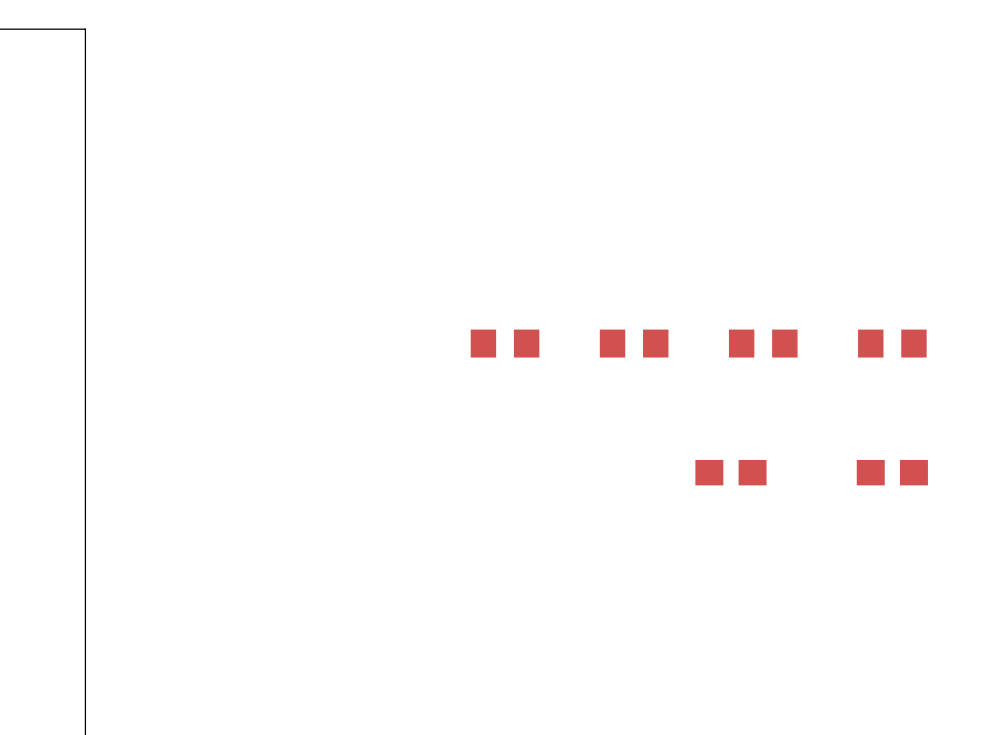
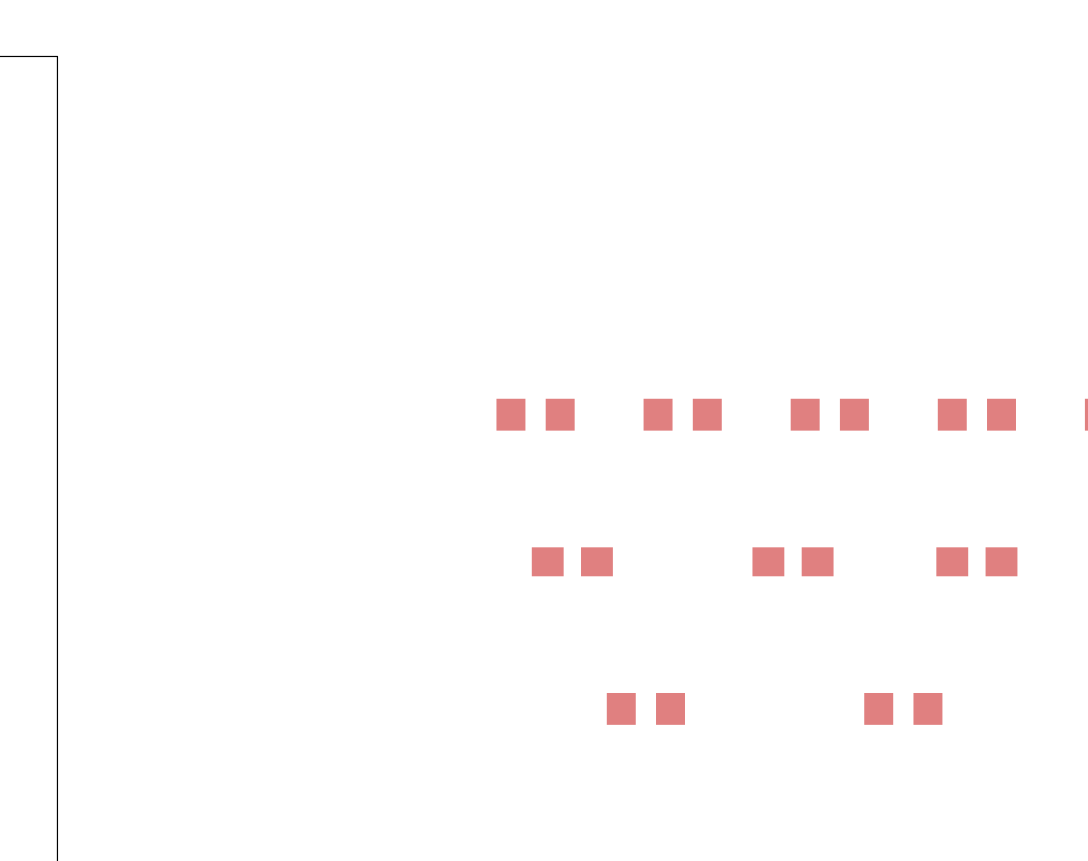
part: none -> (572, 561)
part: none -> (645, 708)
part: none -> (903, 708)

